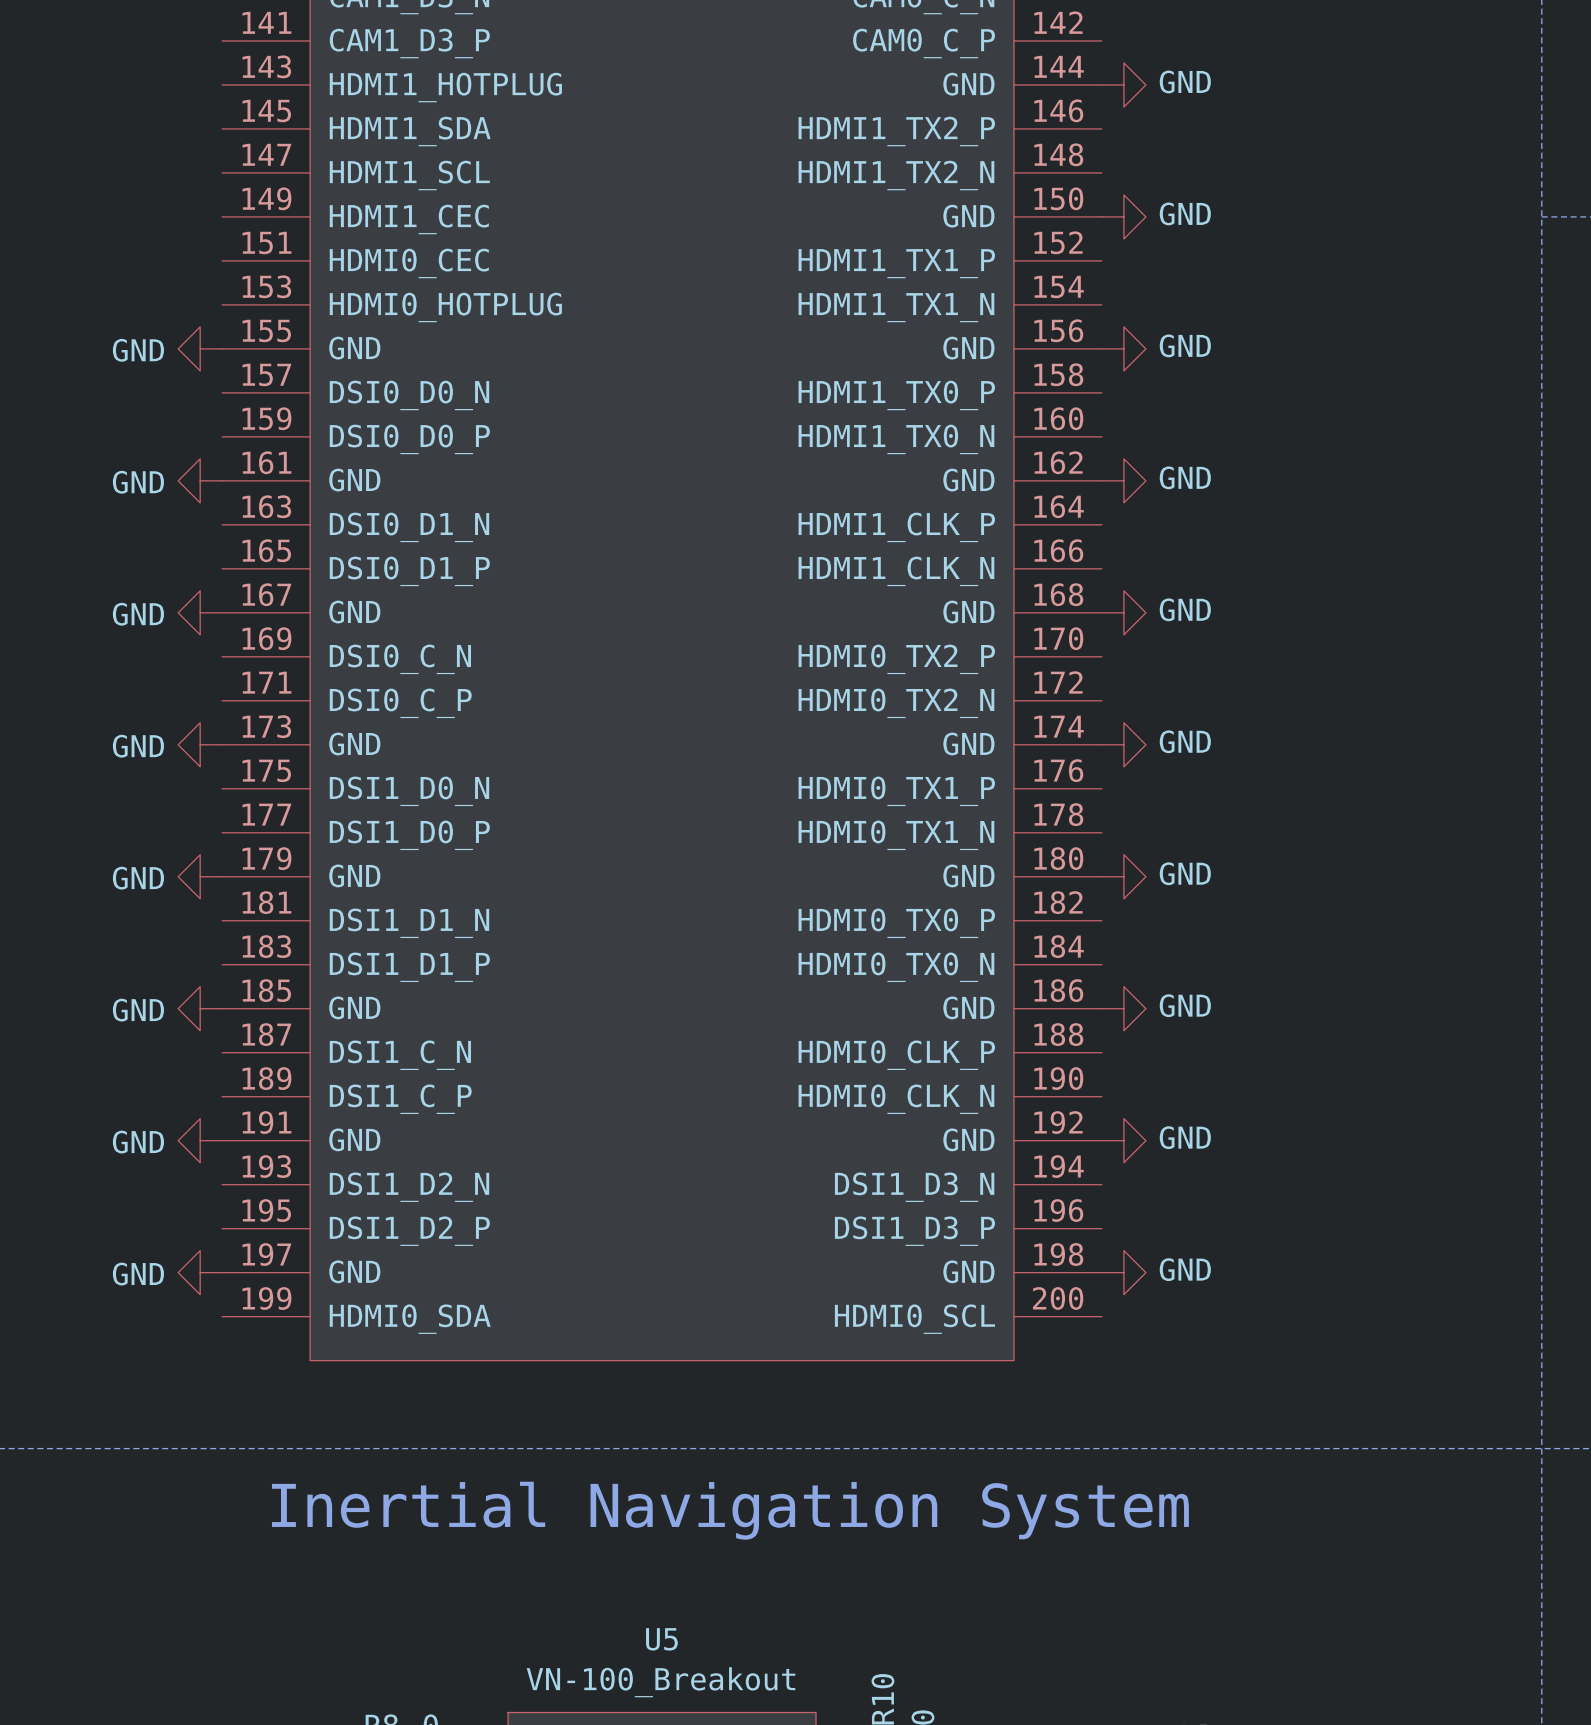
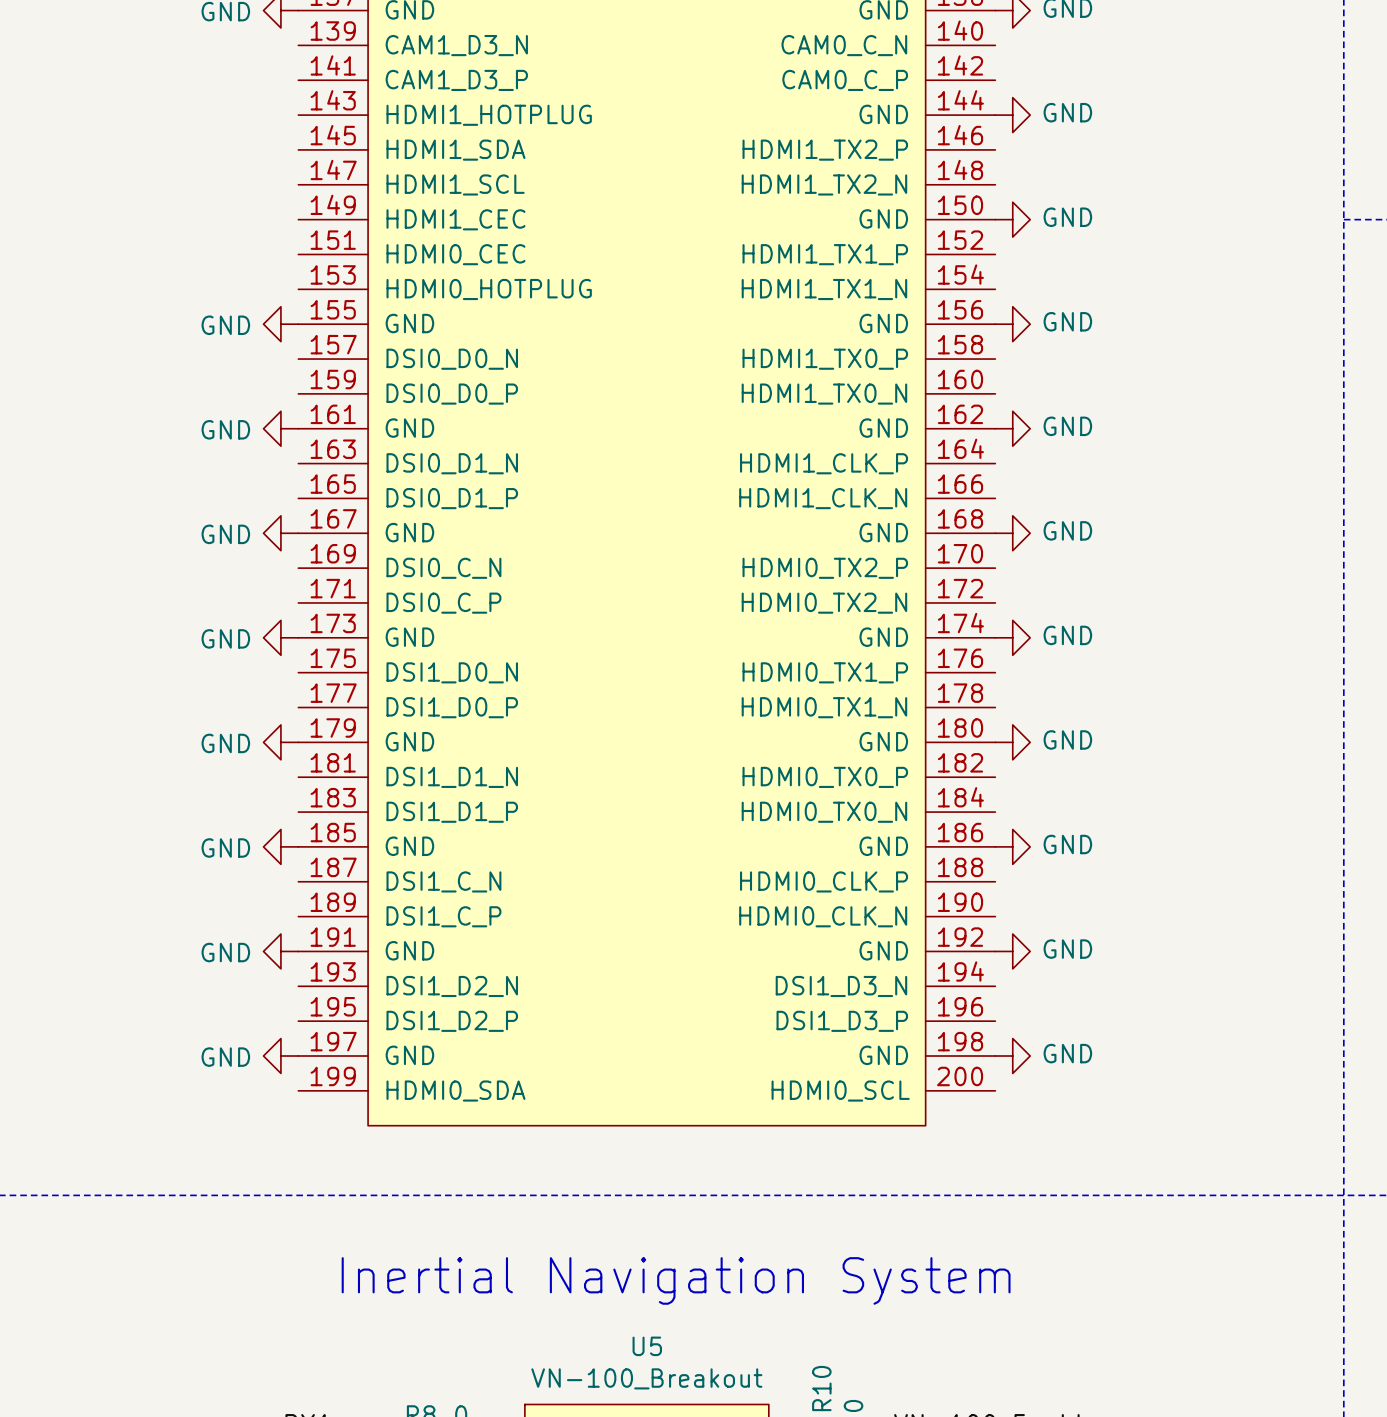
text position: Inertial Navigation System (730, 1510) -> Inertial Navigation System (676, 1280)

